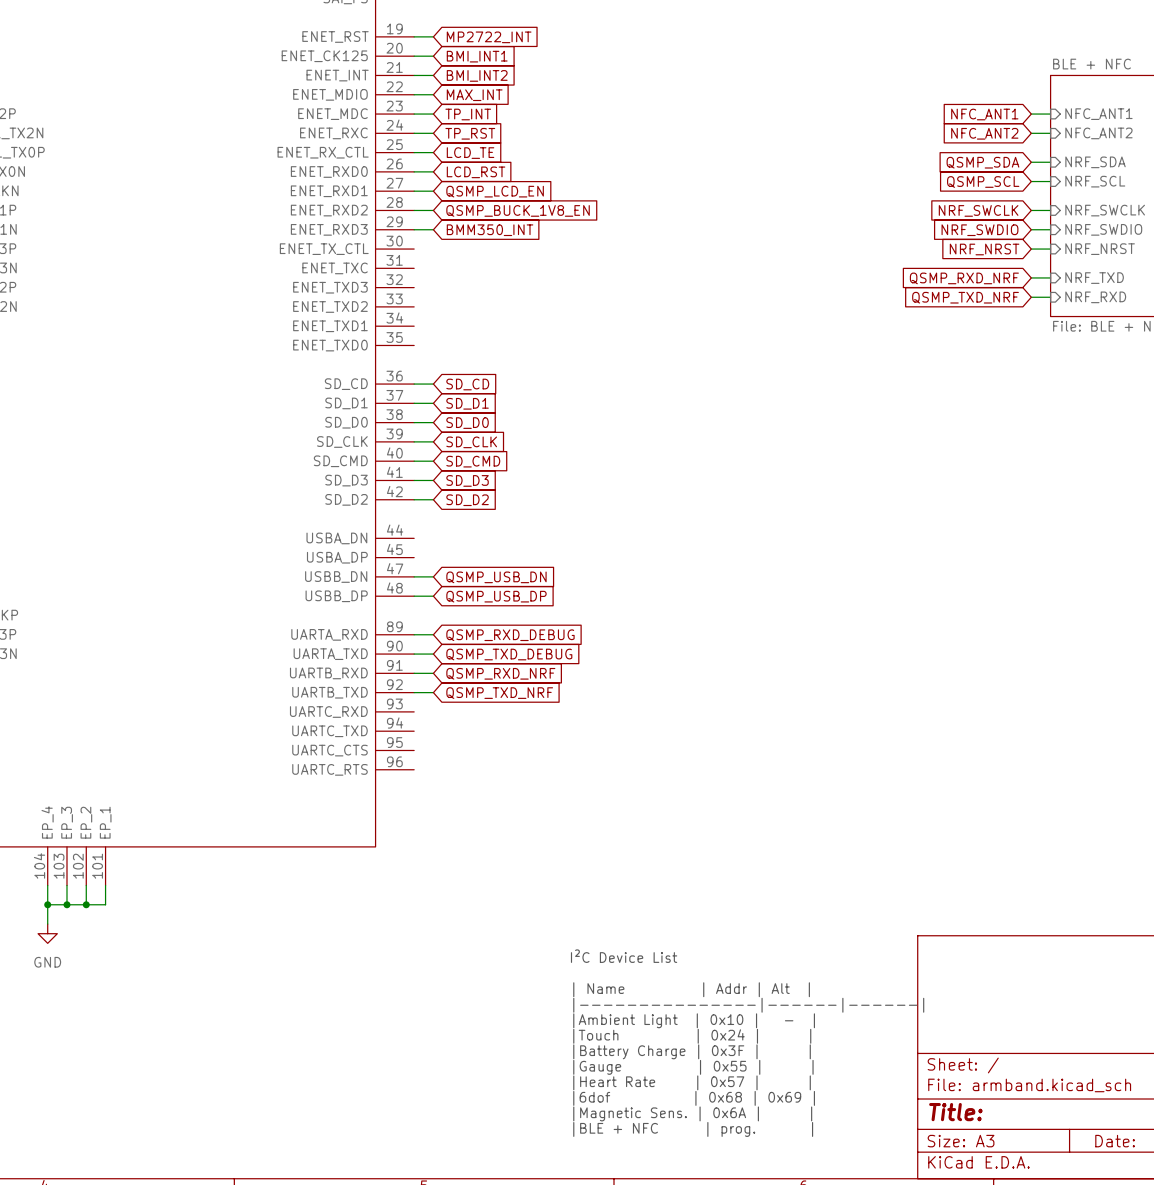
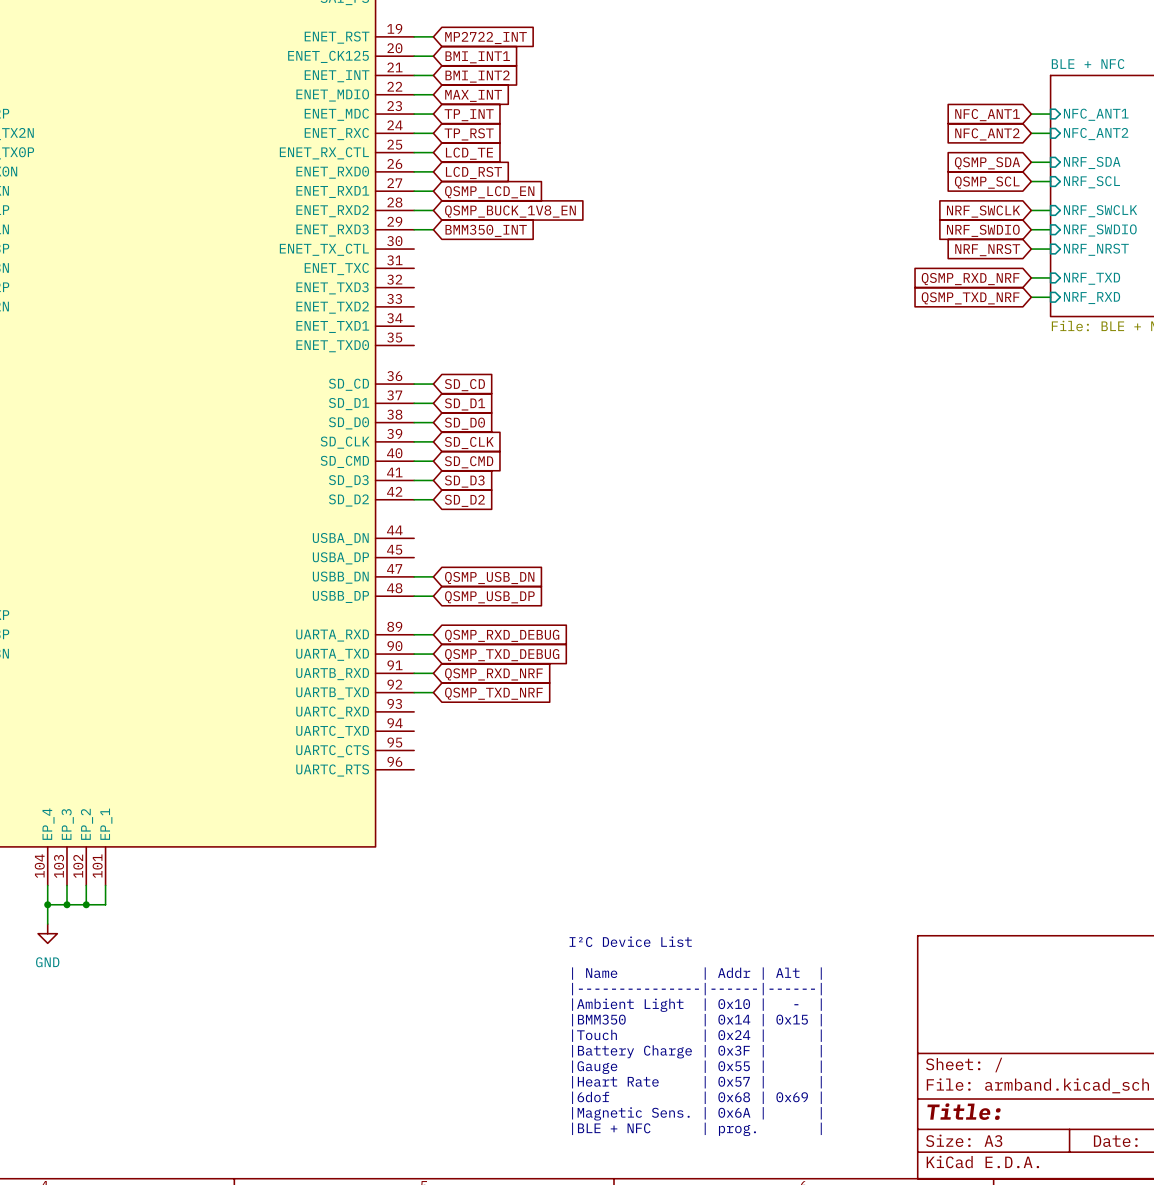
text position: I²C Device List (624, 956) -> I²C Device List (630, 941)
text: none -> | Name | Addr | Alt | (696, 973)
text: | Name | Addr | Alt | (691, 989) -> |---------------|------|------| (696, 989)
text: |---------------|------|------| (748, 1005) -> |Ambient Light | 0x10 | - | (696, 1005)
text: |Ambient Light | 0x10 | - | (694, 1020) -> |BMM350 | 0x14 | 0x15 | (696, 1020)

